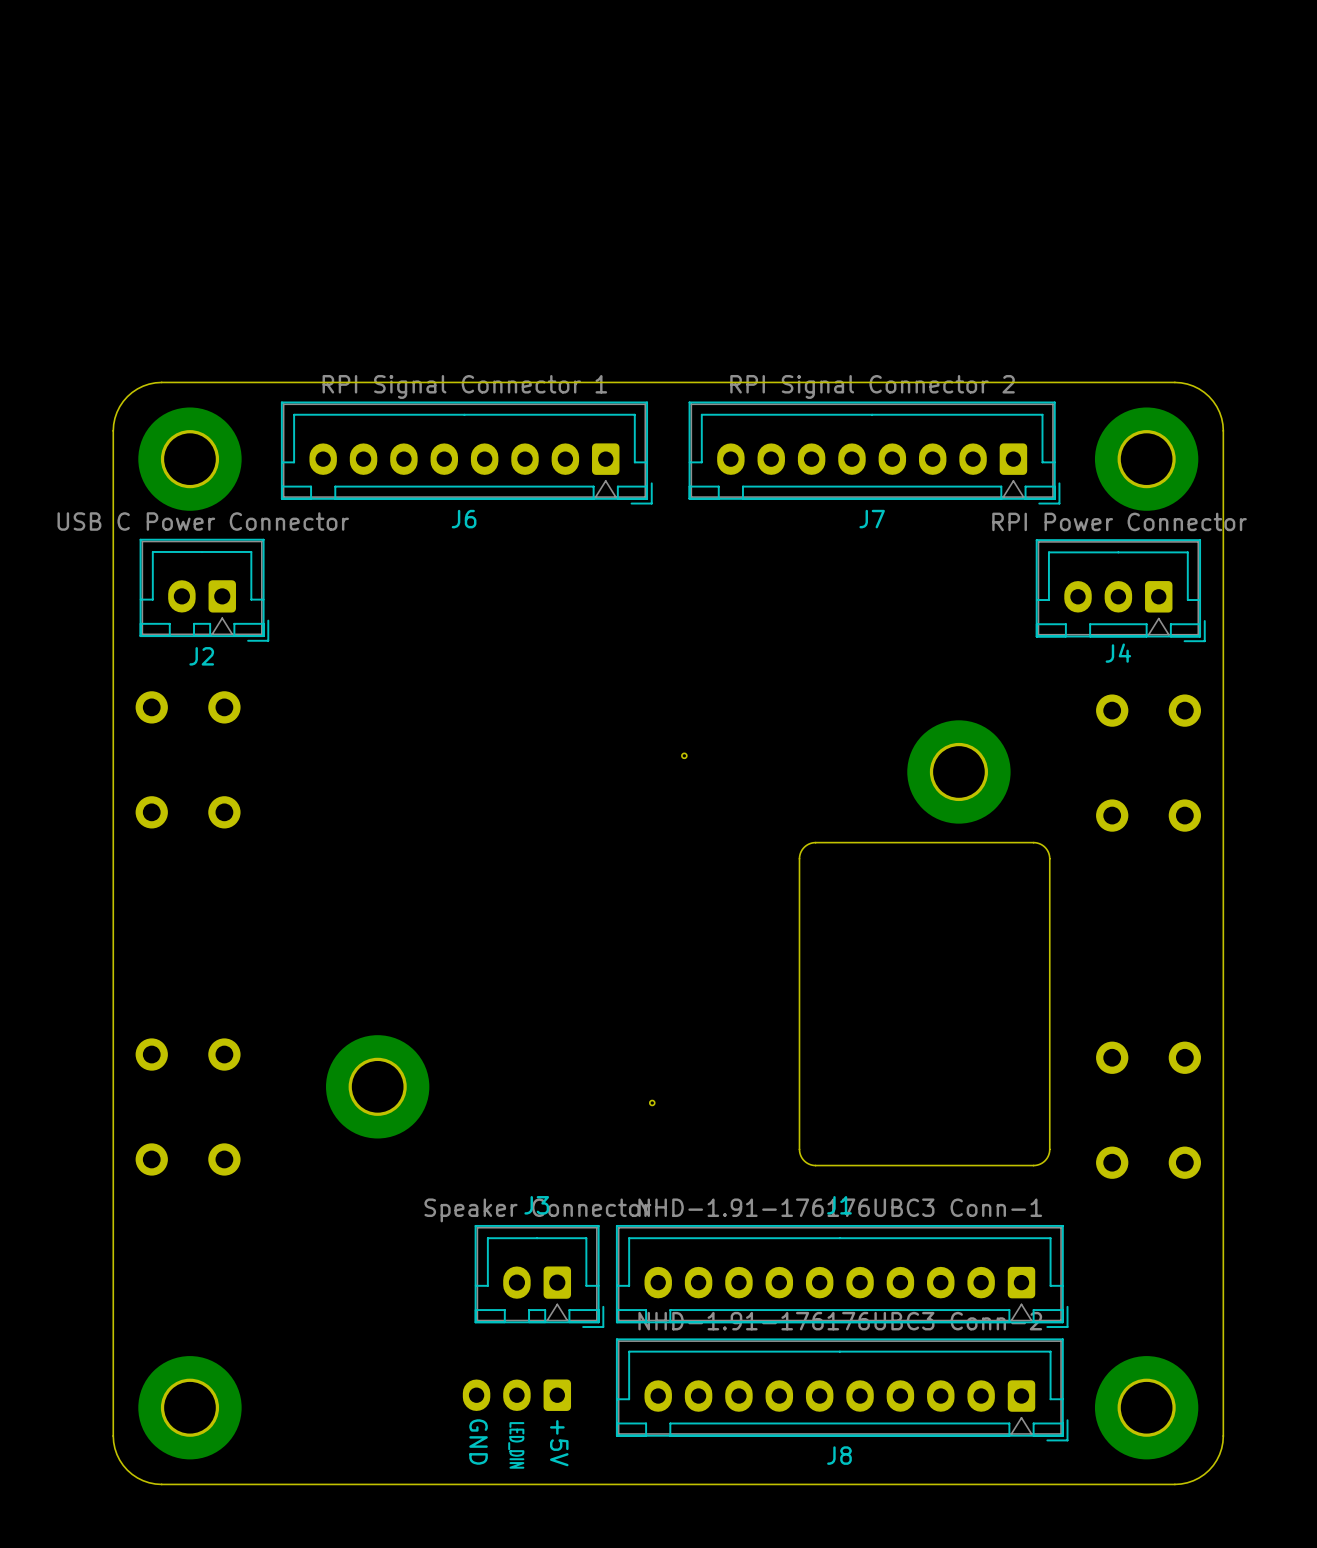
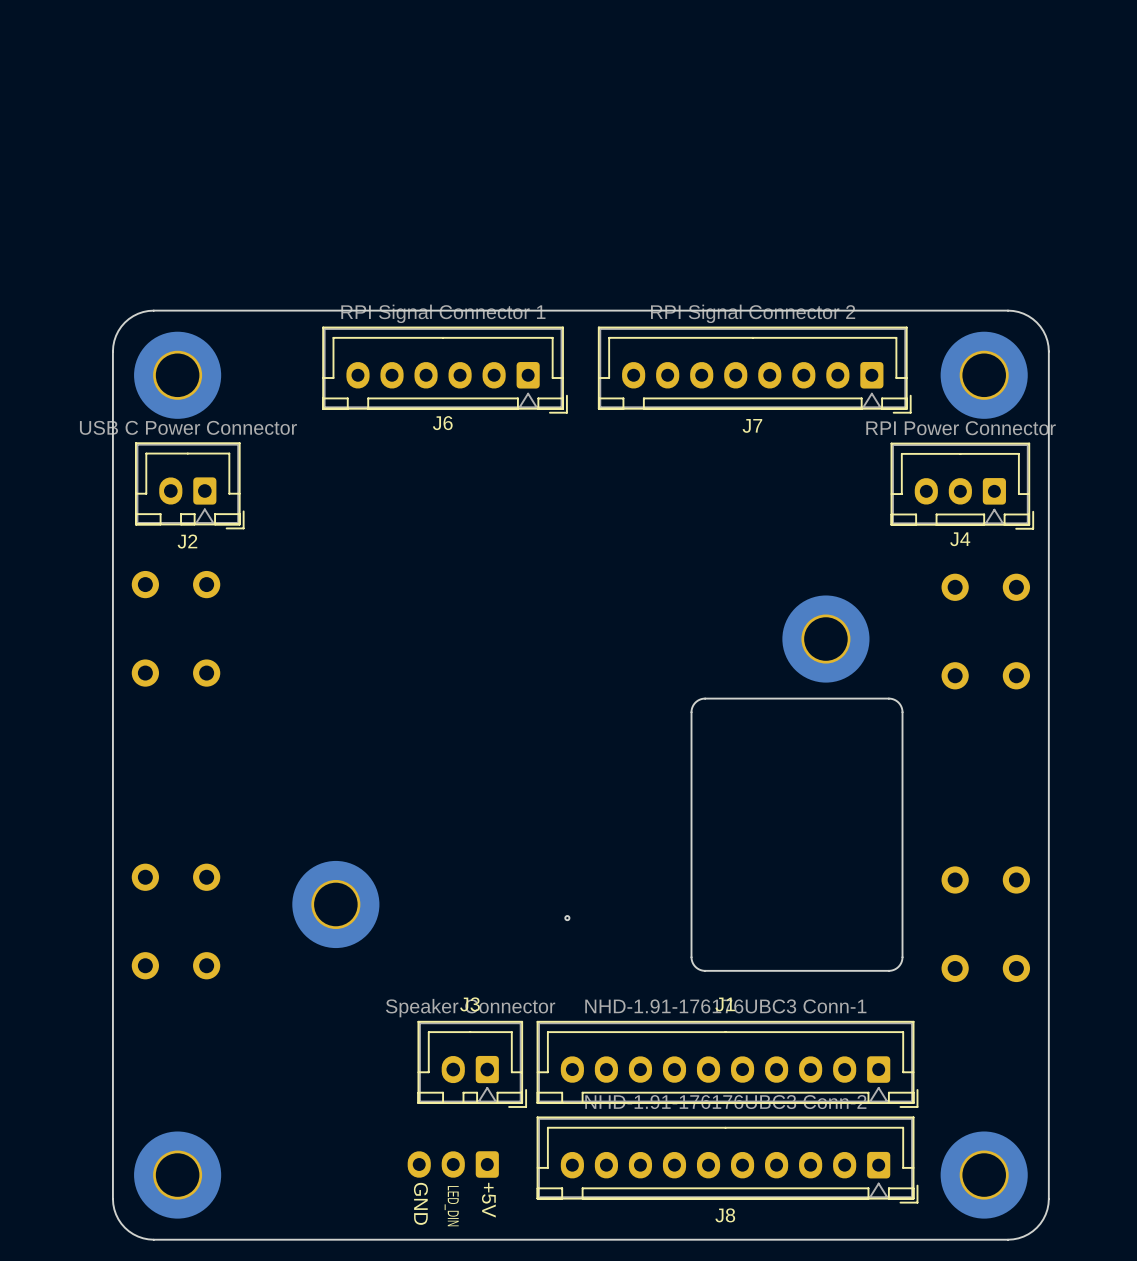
J6 footprint: [280, 401, 653, 505] -> [322, 326, 568, 414]
part: (684, 755) -> none

